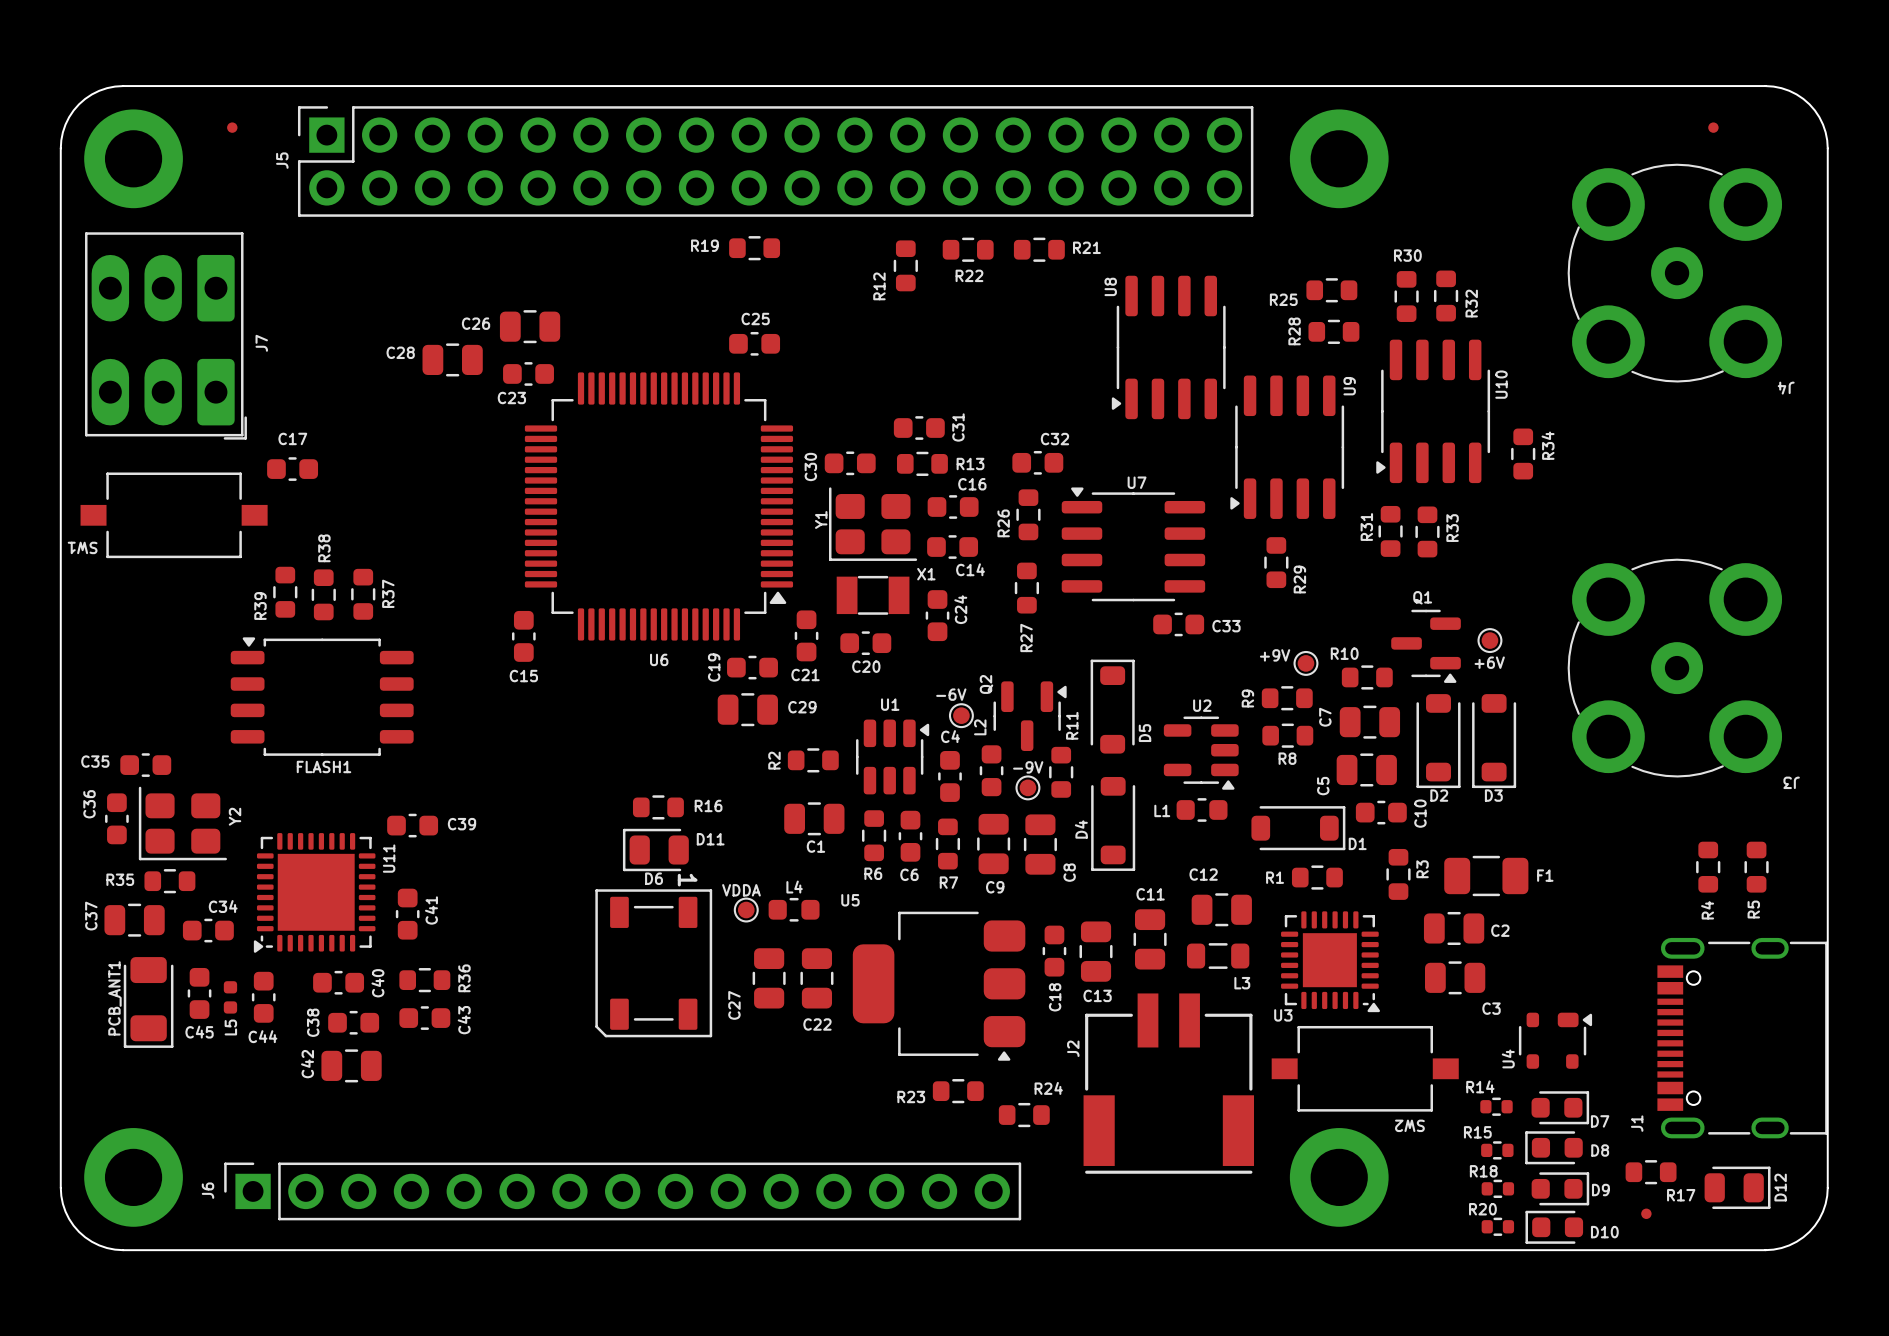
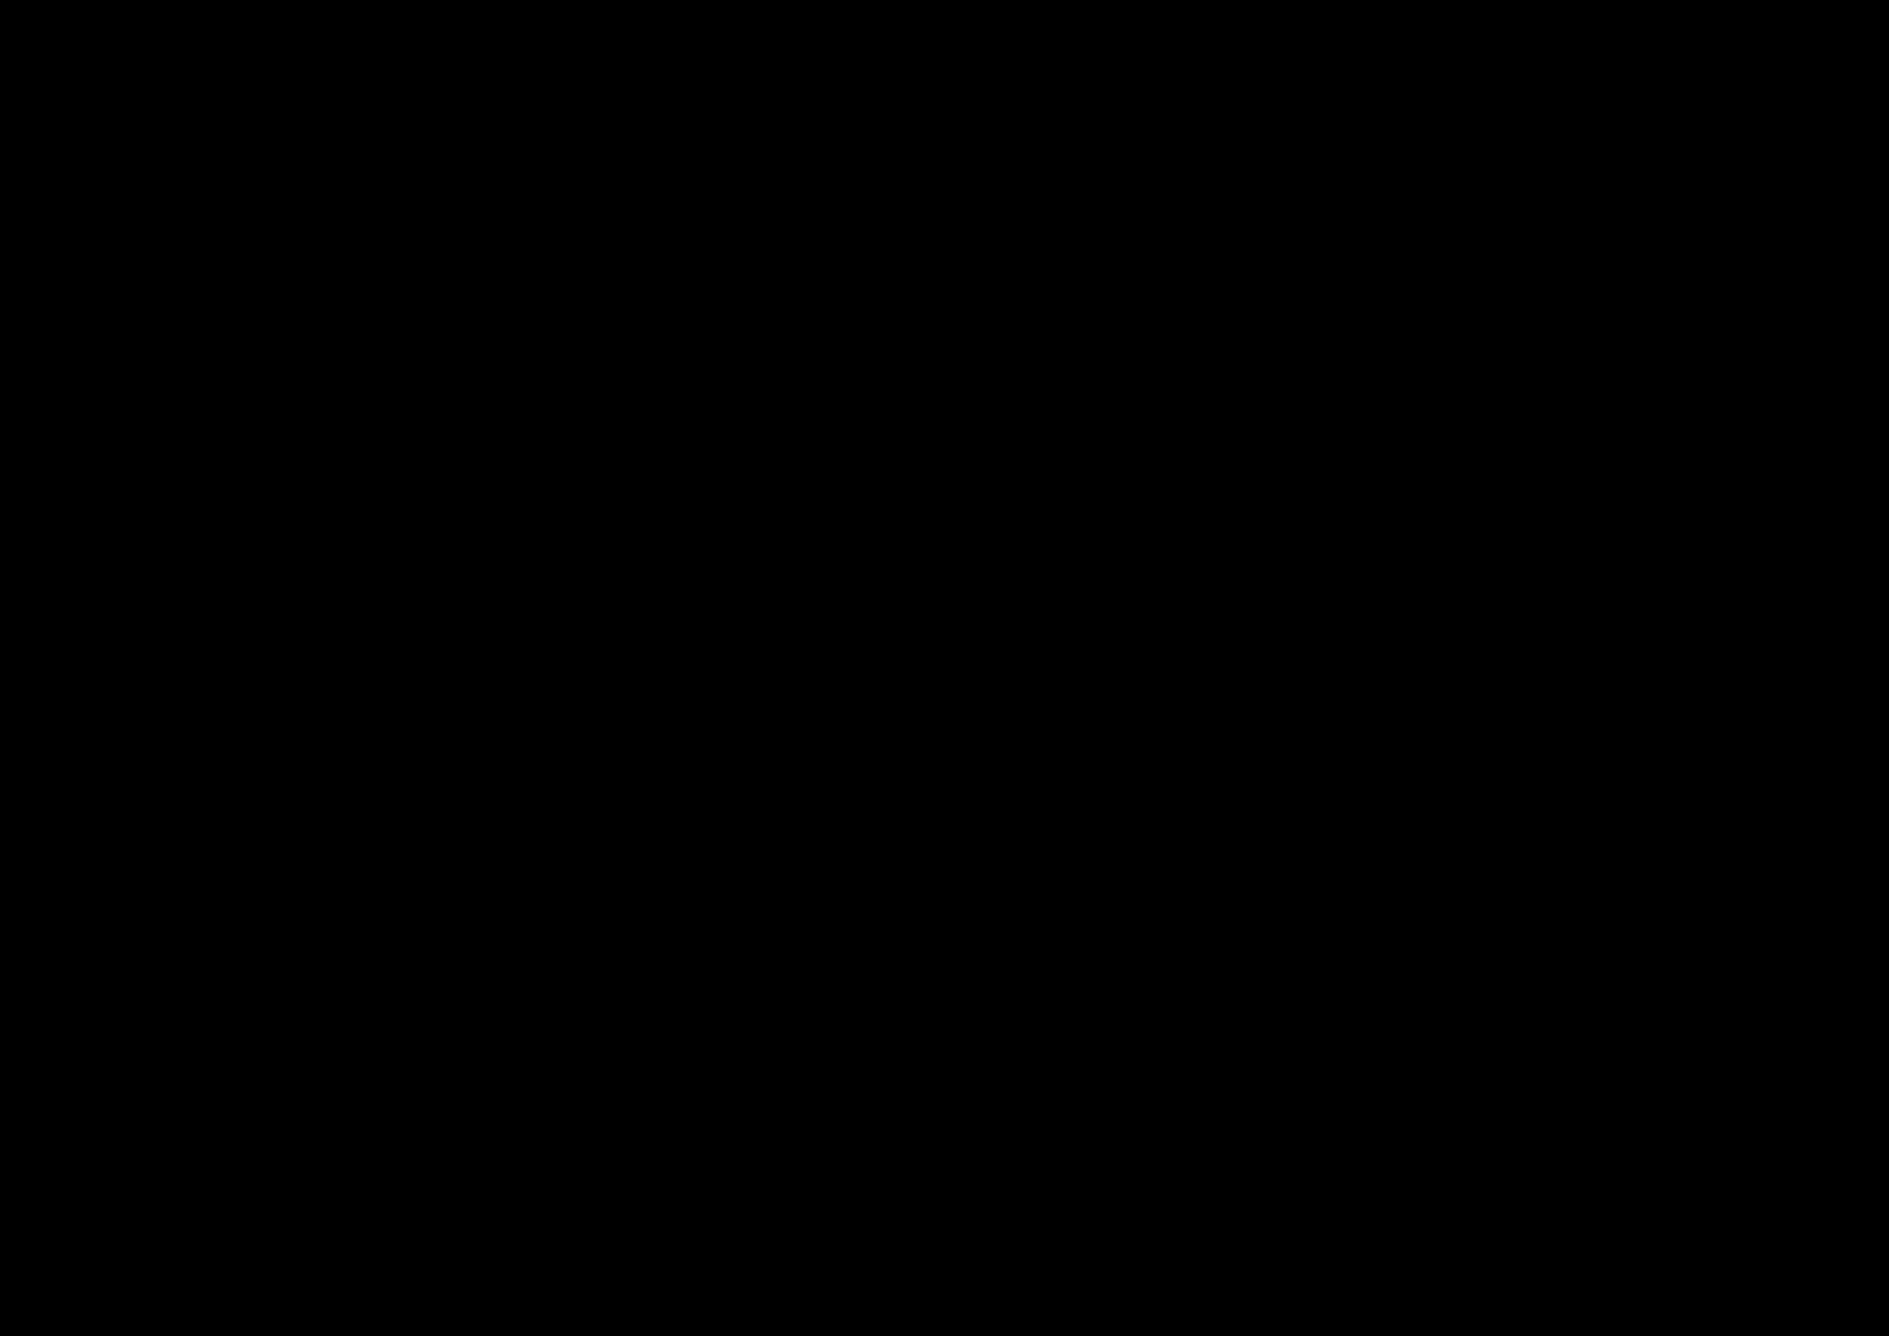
board edge: (123, 86) (1765, 86) (1789, 90) (1803, 98) (1814, 110) (1823, 124) (1827, 148) (1827, 1187) (1825, 1203) (1814, 1225) (1803, 1237) (1789, 1245) (1765, 1250) (123, 1250) (107, 1248) (85, 1237) (73, 1225) (65, 1211) (60, 1187) (60, 148) (65, 124) (79, 104) (99, 90) (123, 86) -> none
part: (232, 127) -> none
part: (1713, 127) -> none
part: (133, 158) -> none
part: (1339, 158) -> none
J5: (775, 161) -> none
R19: (754, 248) -> none
R22: (968, 249) -> none
R21: (1039, 249) -> none
R12: (905, 265) -> none
J4: (1674, 273) -> none
R25: (1331, 290) -> none
R30: (1406, 296) -> none
R32: (1446, 296) -> none
C26: (530, 326) -> none
R28: (1333, 331) -> none
J7: (165, 335) -> none
C25: (754, 343) -> none
U8: (1168, 347) -> none
C28: (452, 359) -> none
C23: (528, 373) -> none
U10: (1433, 411) -> none
C31: (919, 428) -> none
U9: (1287, 447) -> none
R34: (1523, 453) -> none
C32: (1037, 462) -> none
C30: (850, 463) -> none
R13: (922, 463) -> none
C17: (292, 469) -> none
U6: (658, 506) -> none
C16: (953, 507) -> none
R26: (1028, 514) -> none
SW1: (174, 515) -> none
Y1: (873, 524) -> none
R31: (1390, 531) -> none
R33: (1427, 531) -> none
U7: (1133, 544) -> none
C14: (952, 547) -> none
R29: (1276, 562) -> none
R27: (1026, 588) -> none
R39: (285, 592) -> none
R38: (323, 594) -> none
R37: (363, 594) -> none
X1: (873, 595) -> none
C24: (937, 615) -> none
C33: (1178, 624) -> none
C21: (806, 635) -> none
C15: (523, 636) -> none
part: (1489, 640) -> none
C20: (865, 643) -> none
Q1: (1426, 646) -> none
text: +9V (1275, 655) -> none
text: +6V (1489, 662) -> none
part: (1305, 663) -> none
C19: (752, 667) -> none
J3: (1674, 668) -> none
R10: (1367, 677) -> none
text: -6V (951, 694) -> none
FLASH1: (322, 696) -> none
R9: (1287, 698) -> none
D5: (1112, 706) -> none
C29: (747, 709) -> none
part: (961, 715) -> none
Q2: (1030, 716) -> none
C7: (1369, 722) -> none
R8: (1287, 735) -> none
D2: (1438, 741) -> none
D3: (1494, 741) -> none
U2: (1201, 753) -> none
U1: (892, 756) -> none
R2: (813, 760) -> none
C35: (145, 765) -> none
text: -9V (1028, 767) -> none
C5: (1366, 769) -> none
L2: (991, 770) -> none
R11: (1061, 772) -> none
C4: (949, 776) -> none
part: (1027, 787) -> none
R16: (658, 807) -> none
L1: (1202, 809) -> none
C10: (1381, 812) -> none
C36: (116, 818) -> none
C1: (814, 818) -> none
Y2: (182, 823) -> none
D4: (1113, 823) -> none
C39: (412, 825) -> none
D1: (1298, 828) -> none
R6: (874, 835) -> none
C6: (910, 836) -> none
R7: (947, 844) -> none
C9: (993, 844) -> none
C8: (1040, 844) -> none
D11: (655, 850) -> none
R4: (1708, 867) -> none
R5: (1756, 867) -> none
R3: (1398, 874) -> none
F1: (1486, 875) -> none
R1: (1317, 877) -> none
R35: (169, 881) -> none
text: VDDA (741, 890) -> none
U11: (314, 892) -> none
L4: (794, 909) -> none
C12: (1221, 909) -> none
part: (746, 910) -> none
C41: (407, 914) -> none
C37: (134, 920) -> none
C2: (1454, 928) -> none
C34: (208, 930) -> none
C11: (1150, 939) -> none
C18: (1054, 951) -> none
C13: (1096, 951) -> none
L3: (1218, 956) -> none
U3: (1330, 961) -> none
D6: (653, 963) -> none
C3: (1455, 977) -> none
C27: (769, 978) -> none
C22: (816, 978) -> none
R36: (424, 980) -> none
C40: (338, 982) -> none
U5: (939, 986) -> none
C45: (199, 993) -> none
L5: (230, 997) -> none
C44: (263, 997) -> none
PCB_ANT1: (148, 1002) -> none
C43: (424, 1018) -> none
C38: (353, 1022) -> none
J1: (1742, 1038) -> none
U4: (1555, 1040) -> none
C42: (351, 1065) -> none
SW2: (1365, 1068) -> none
J2: (1168, 1083) -> none
R23: (958, 1091) -> none
R14: (1496, 1106) -> none
D7: (1560, 1107) -> none
R24: (1024, 1115) -> none
D8: (1553, 1147) -> none
R15: (1497, 1150) -> none
R17: (1651, 1172) -> none
part: (133, 1177) -> none
part: (1339, 1177) -> none
D12: (1737, 1187) -> none
R18: (1497, 1188) -> none
D9: (1560, 1188) -> none
J6: (622, 1191) -> none
part: (1646, 1213) -> none
R20: (1497, 1226) -> none
D10: (1554, 1227) -> none

